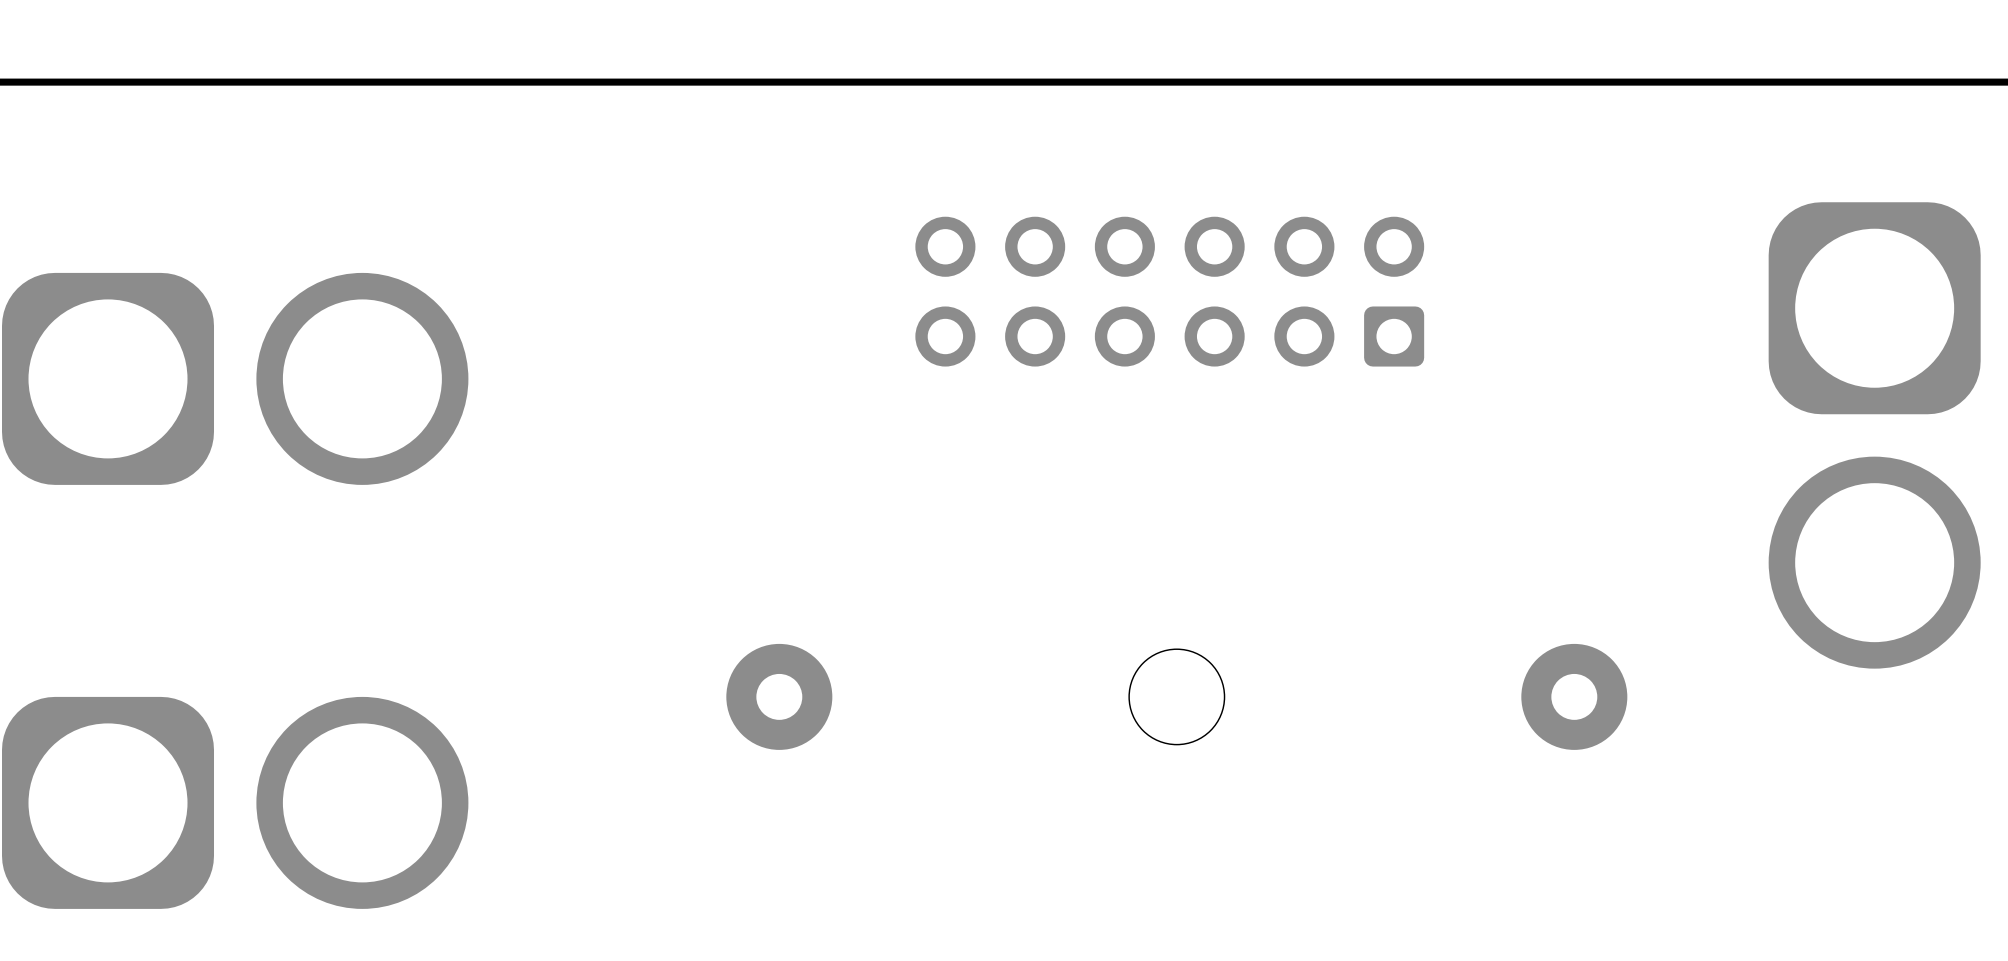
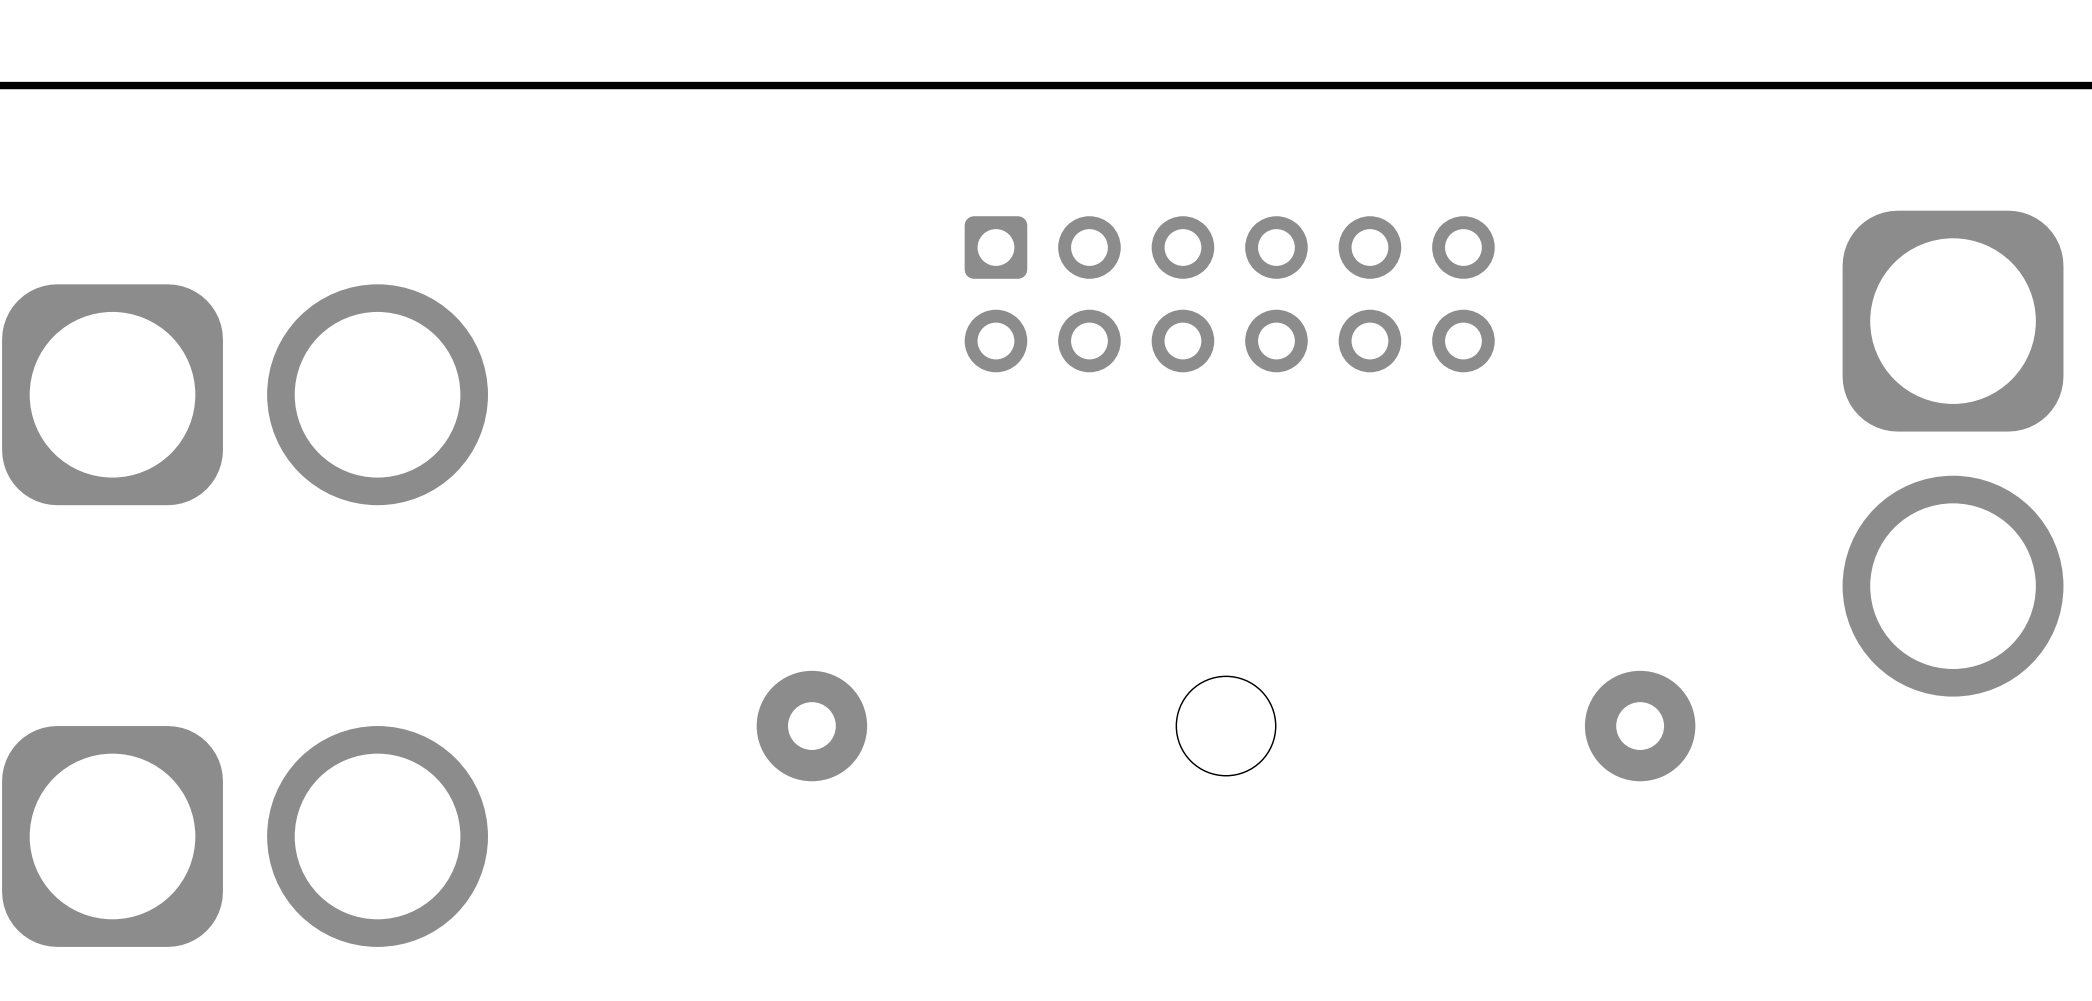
part rotation: 0° (1169, 291) -> 180° (1229, 294)

